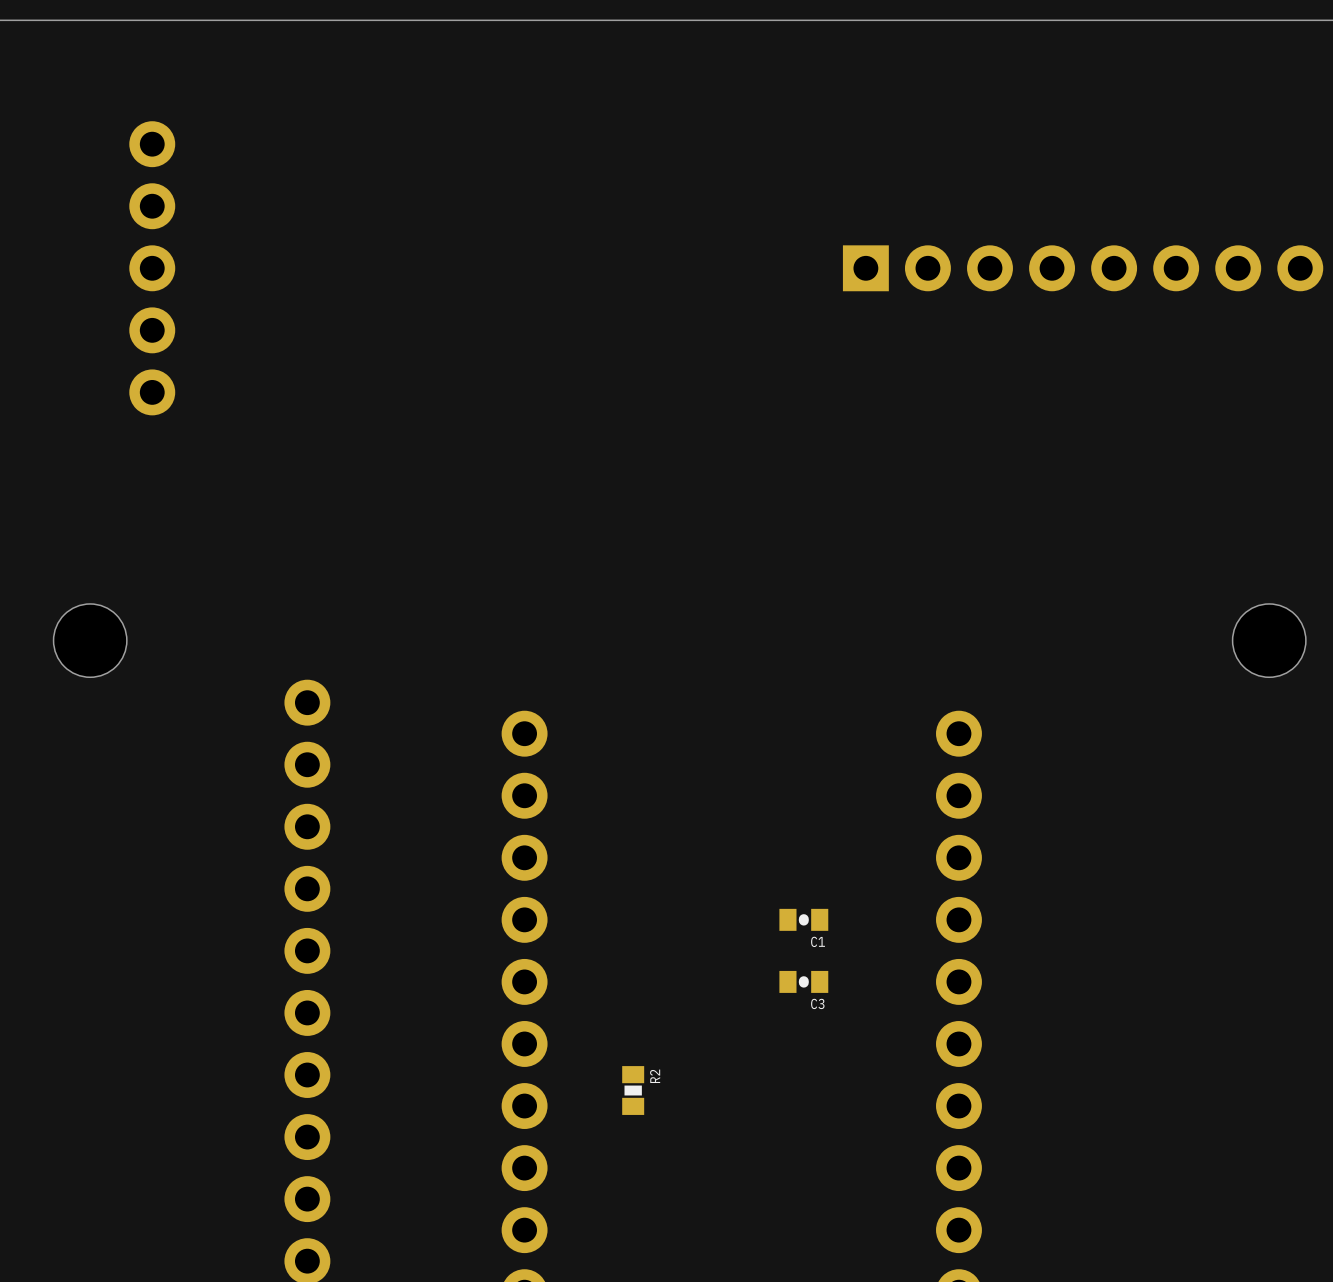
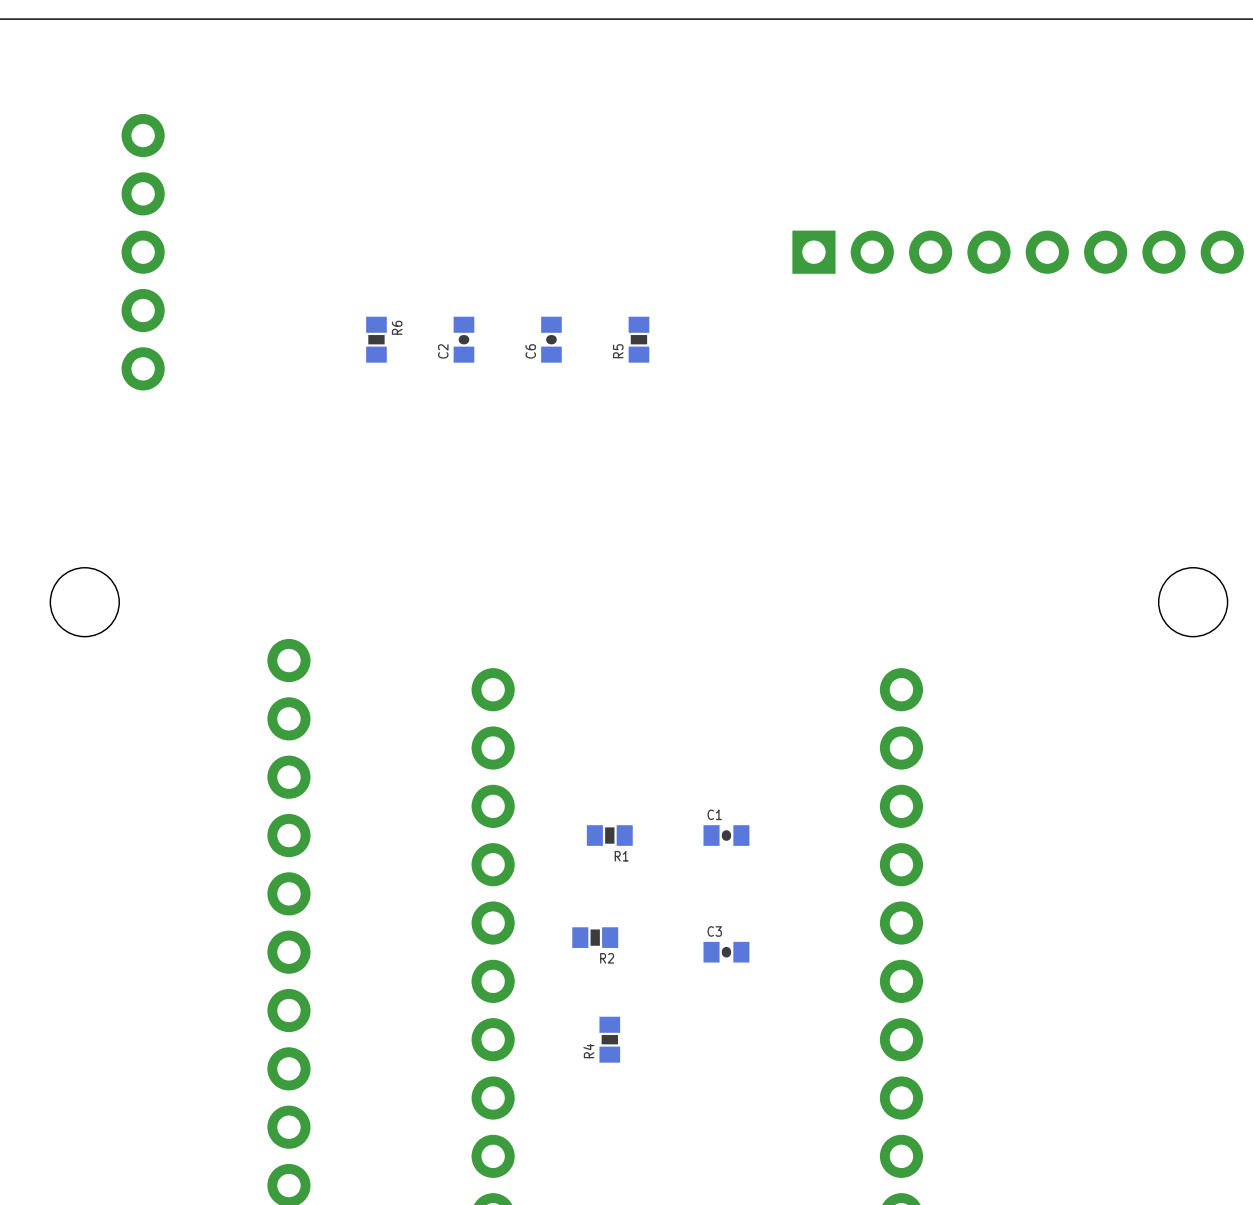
R6: none -> (376, 339)
C2: none -> (463, 339)
C6: none -> (551, 339)
R5: none -> (638, 339)
R1: none -> (609, 835)
C1 position: (803, 919) -> (726, 835)
C1 name position: C1 (818, 941) -> C1 (714, 814)
C3 position: (803, 981) -> (726, 952)
C3 name position: C3 (817, 1003) -> C3 (714, 931)
R2 rotation: 0° (633, 1090) -> 90° clockwise (595, 937)
R2 position: (633, 1090) -> (595, 937)
R4: none -> (609, 1039)

